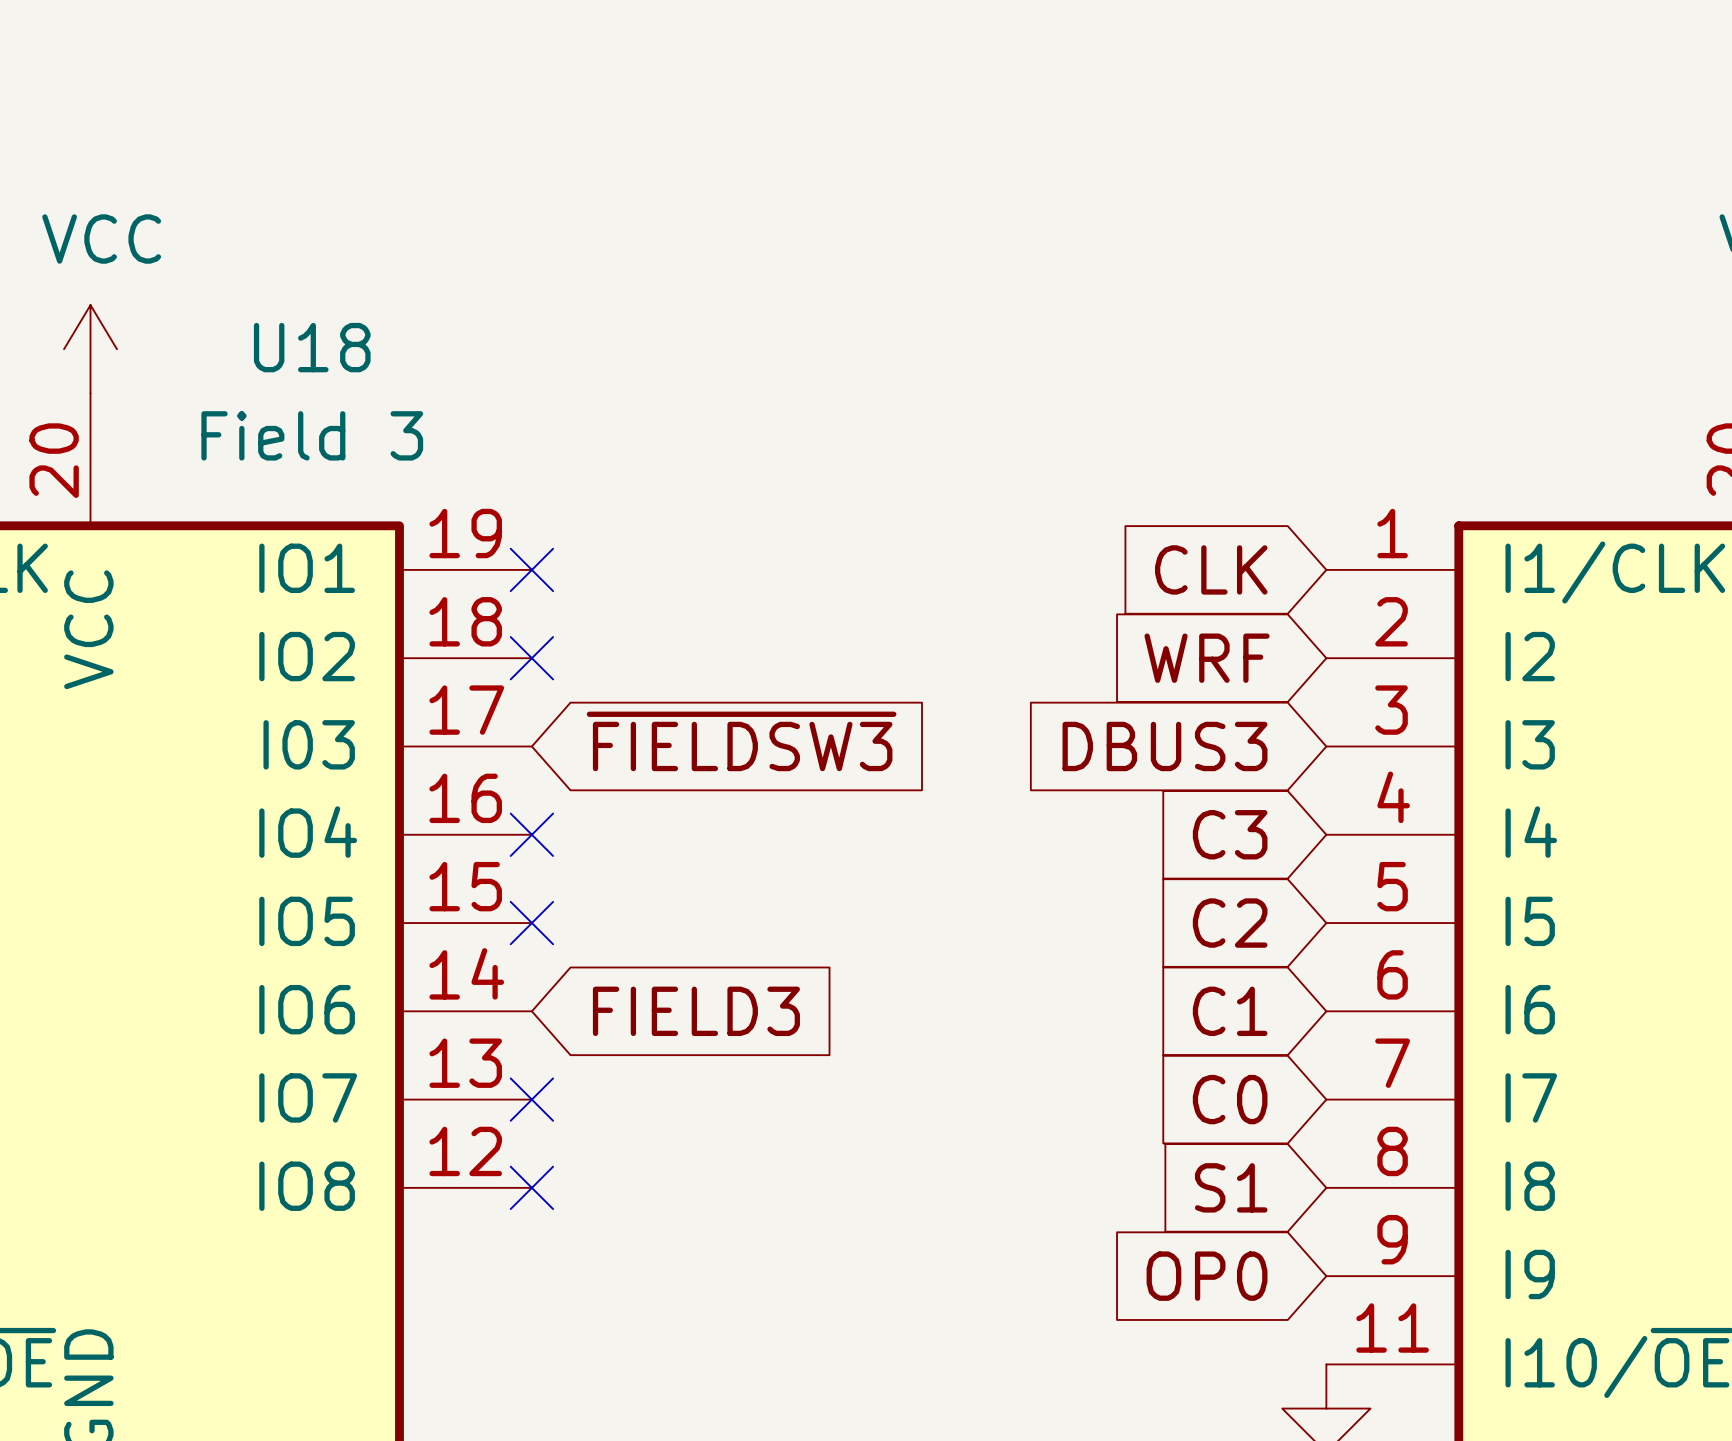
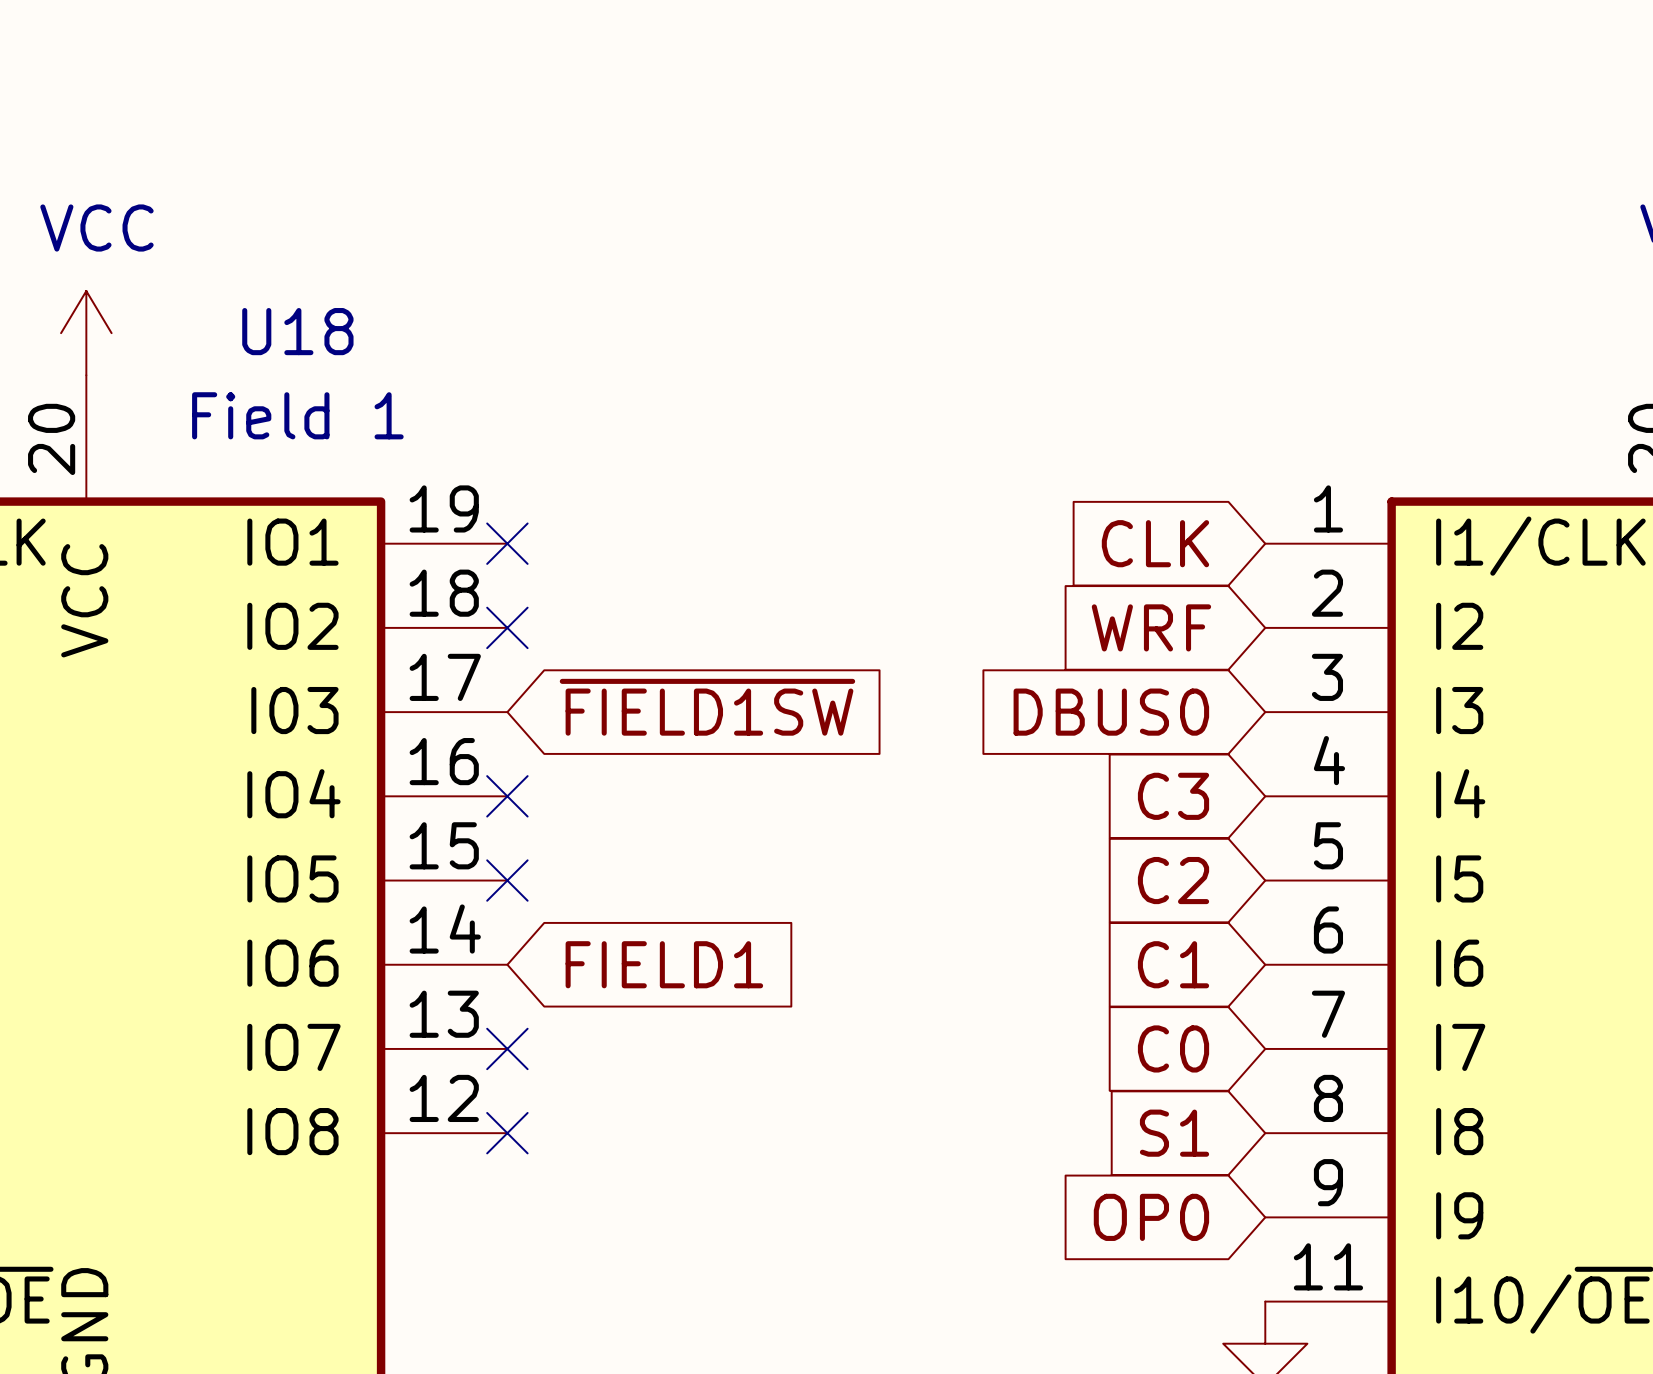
U18 value: Field 3 (312, 435) -> Field 1 (297, 415)
global label: ~{FIELDSW3} (741, 741) -> ~{FIELD1SW} (707, 707)
global label: DBUS3 (1164, 746) -> DBUS0 (1111, 712)
global label: FIELD3 (696, 1011) -> FIELD1 (664, 964)

